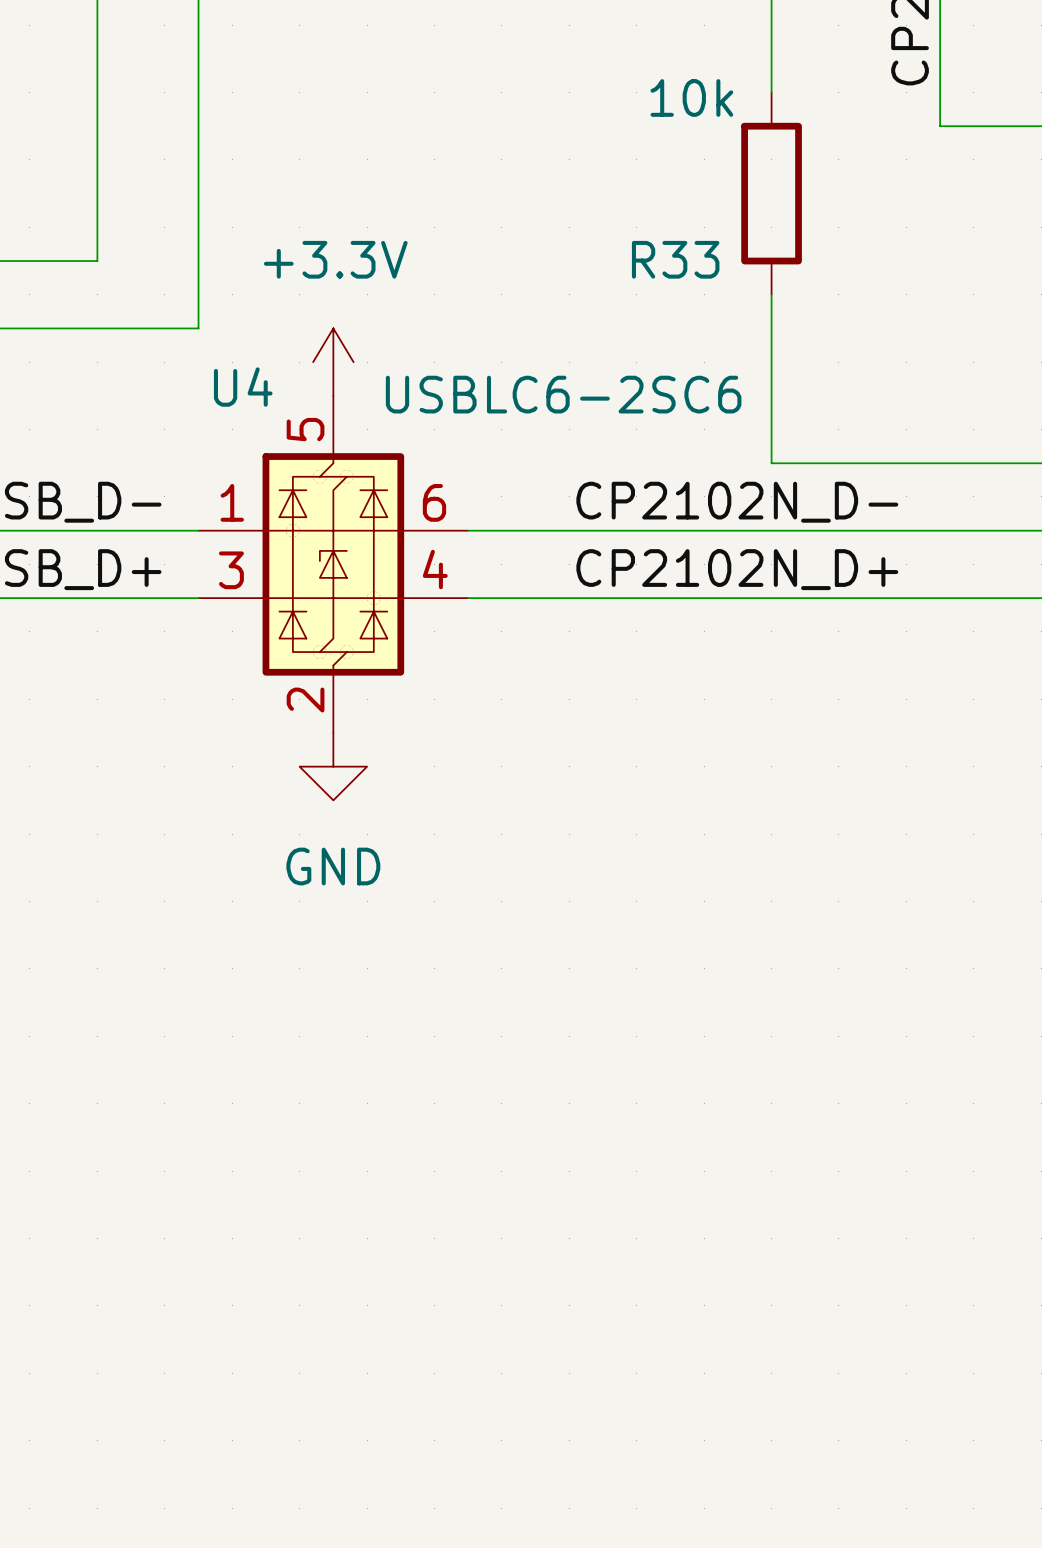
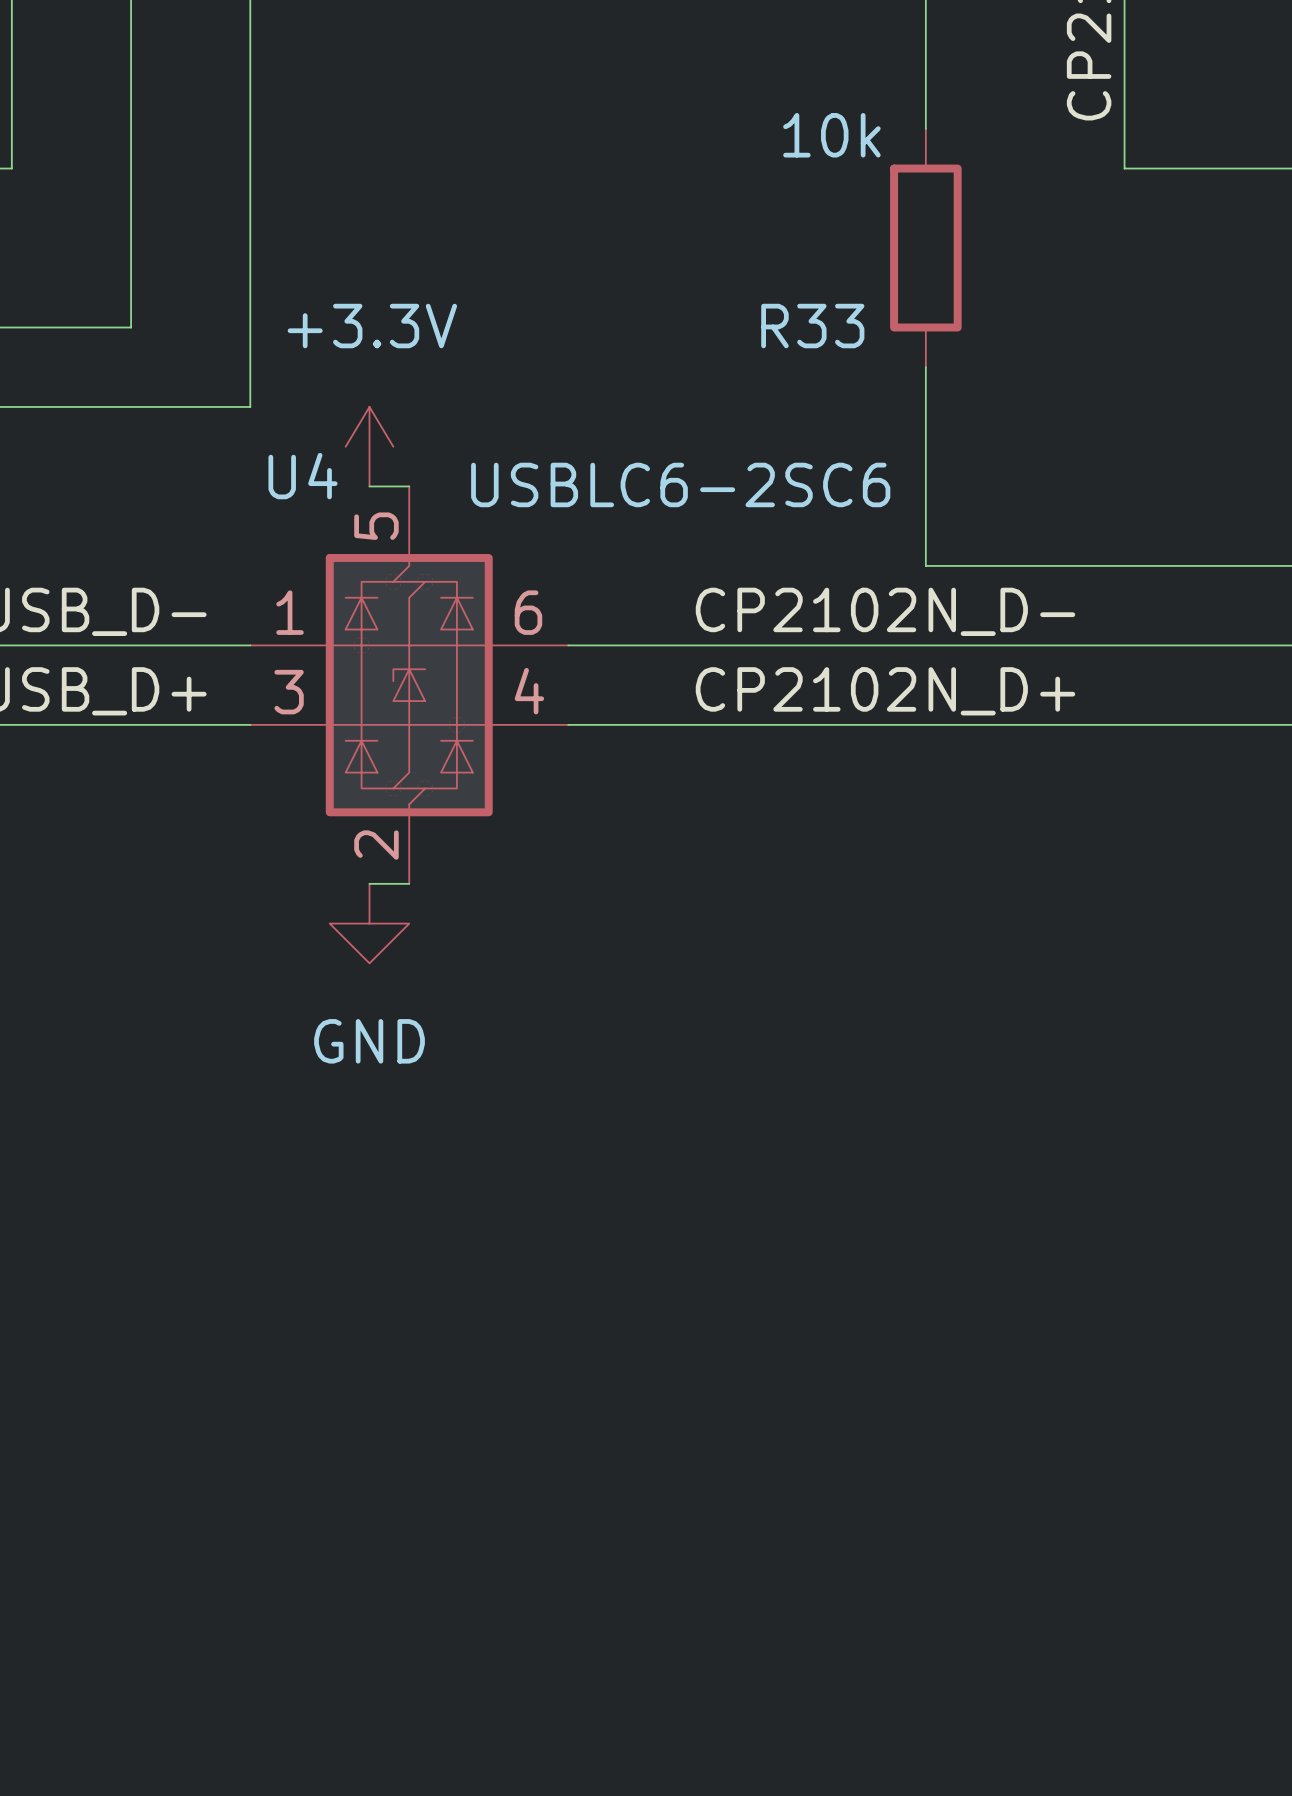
power symbol position: +3.3V (333, 362) -> +3.3V (369, 446)
wire: none -> (369, 486) (409, 486)
wire: none -> (369, 883) (409, 883)
power symbol position: GND (333, 766) -> GND (369, 923)

